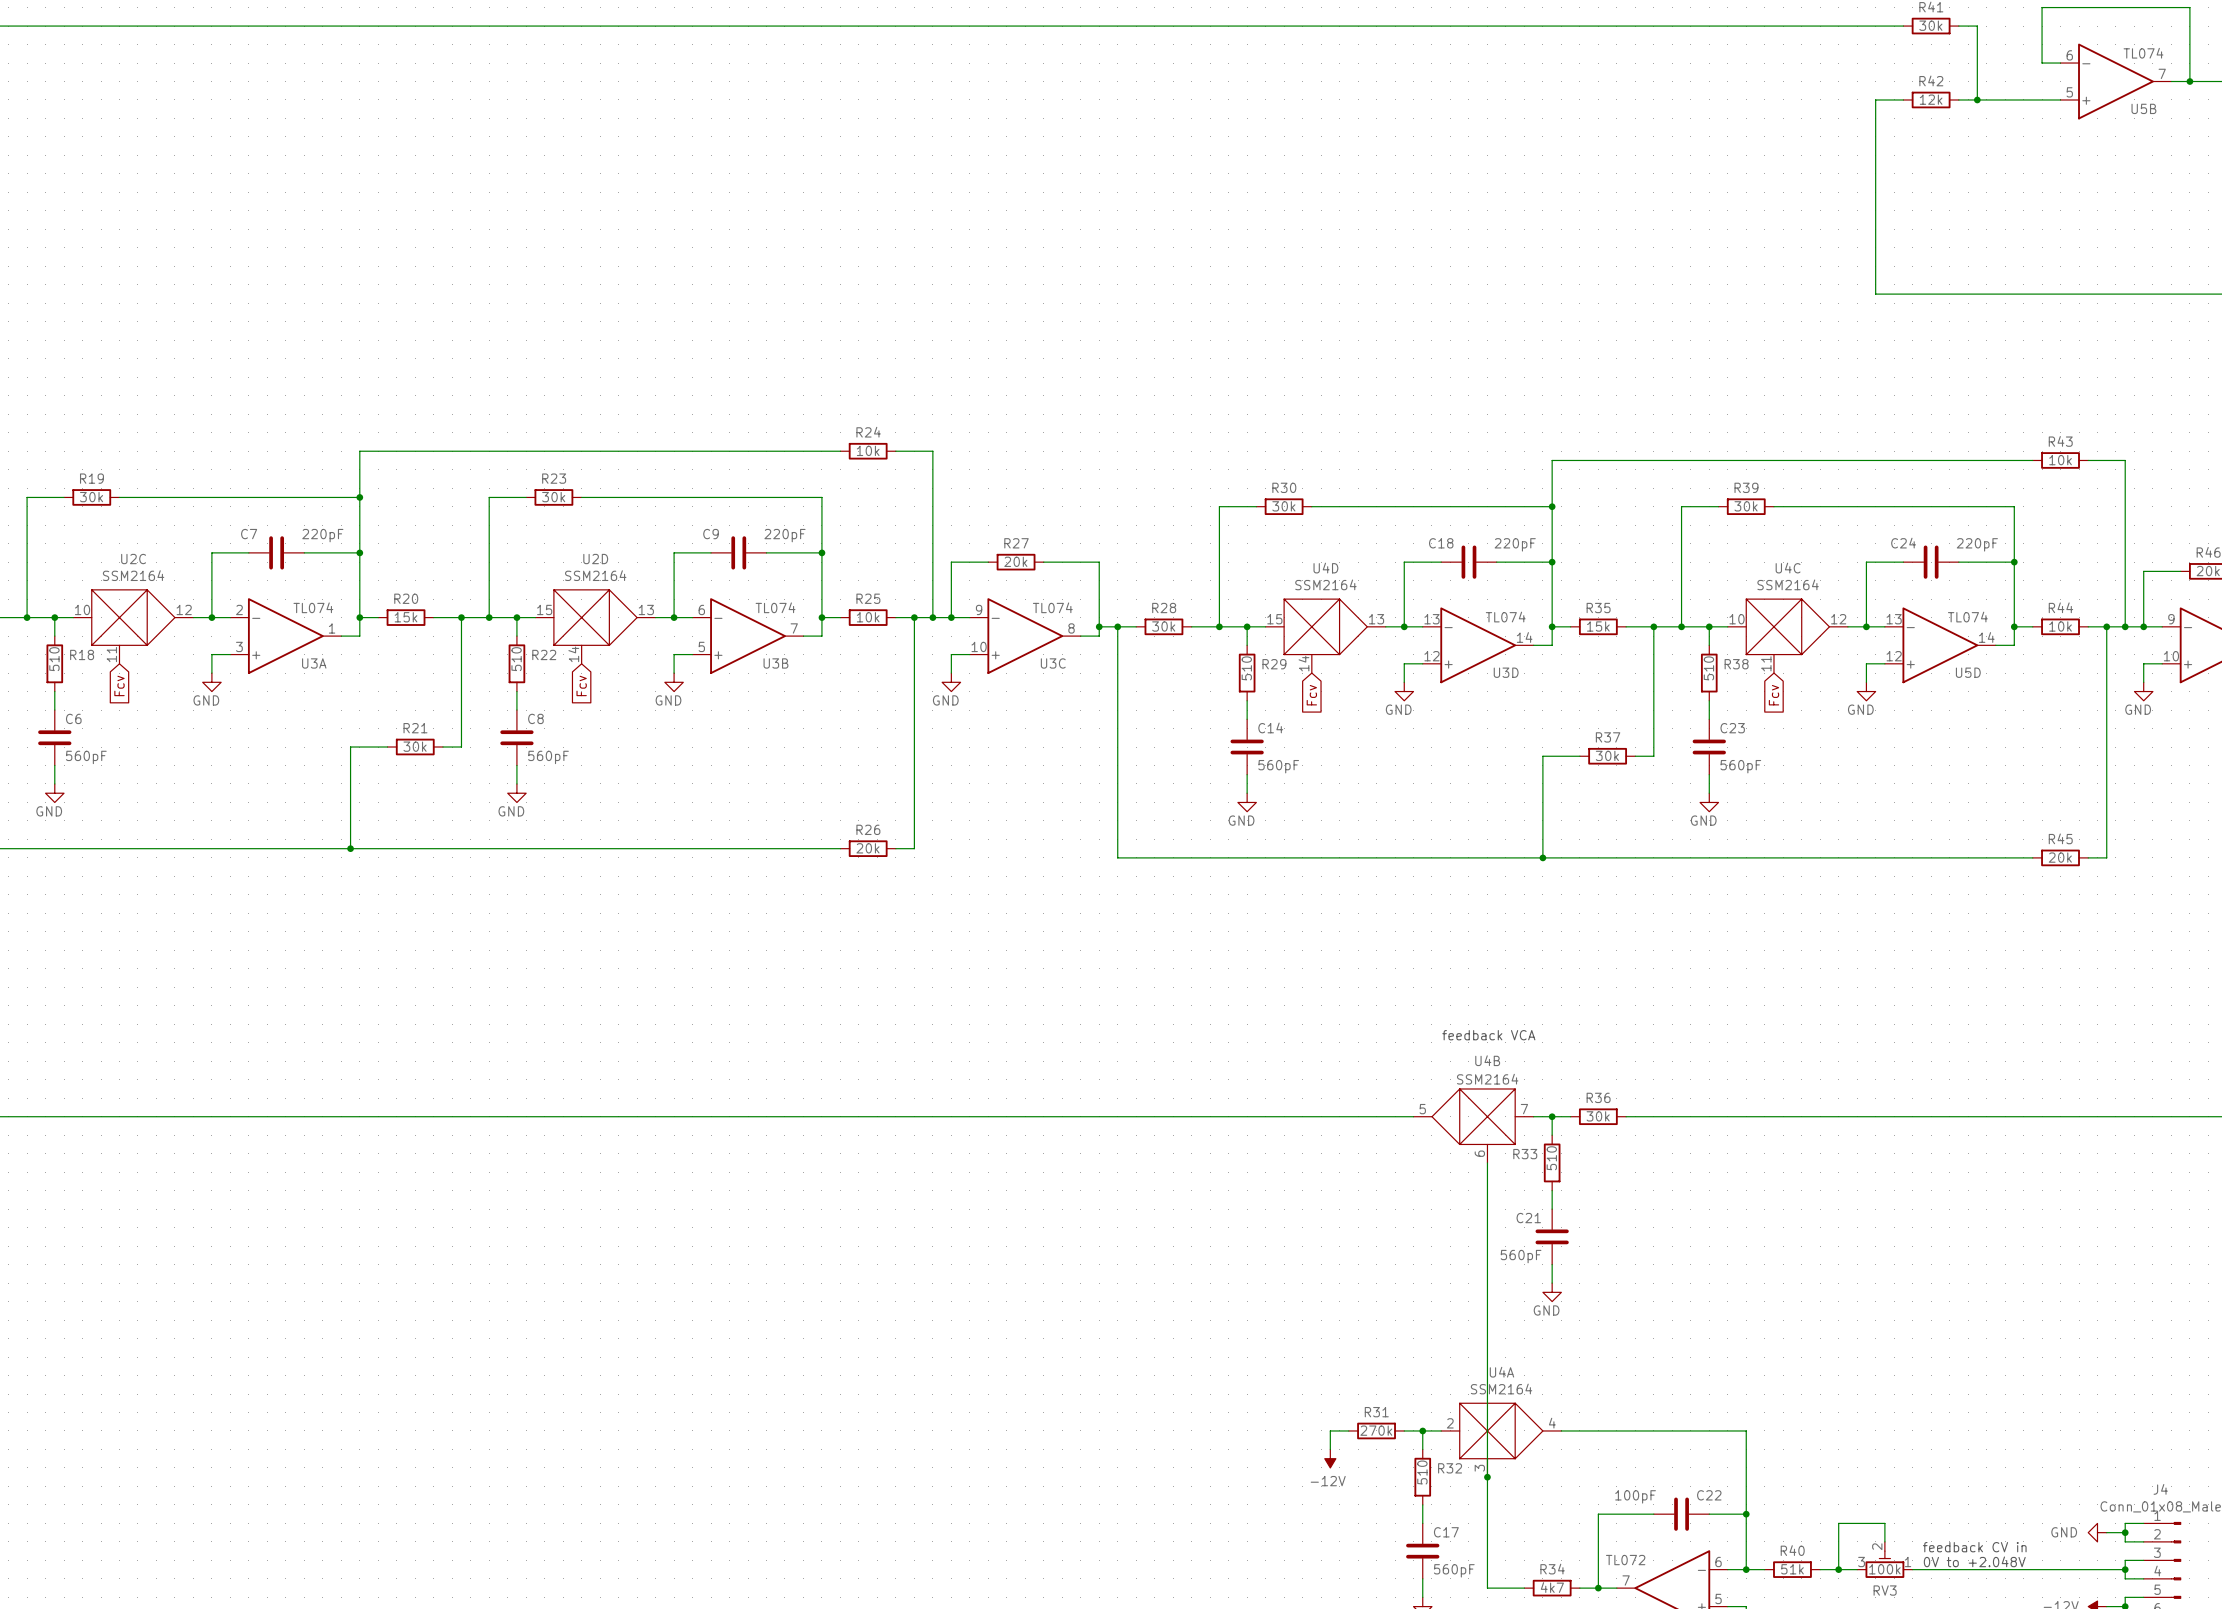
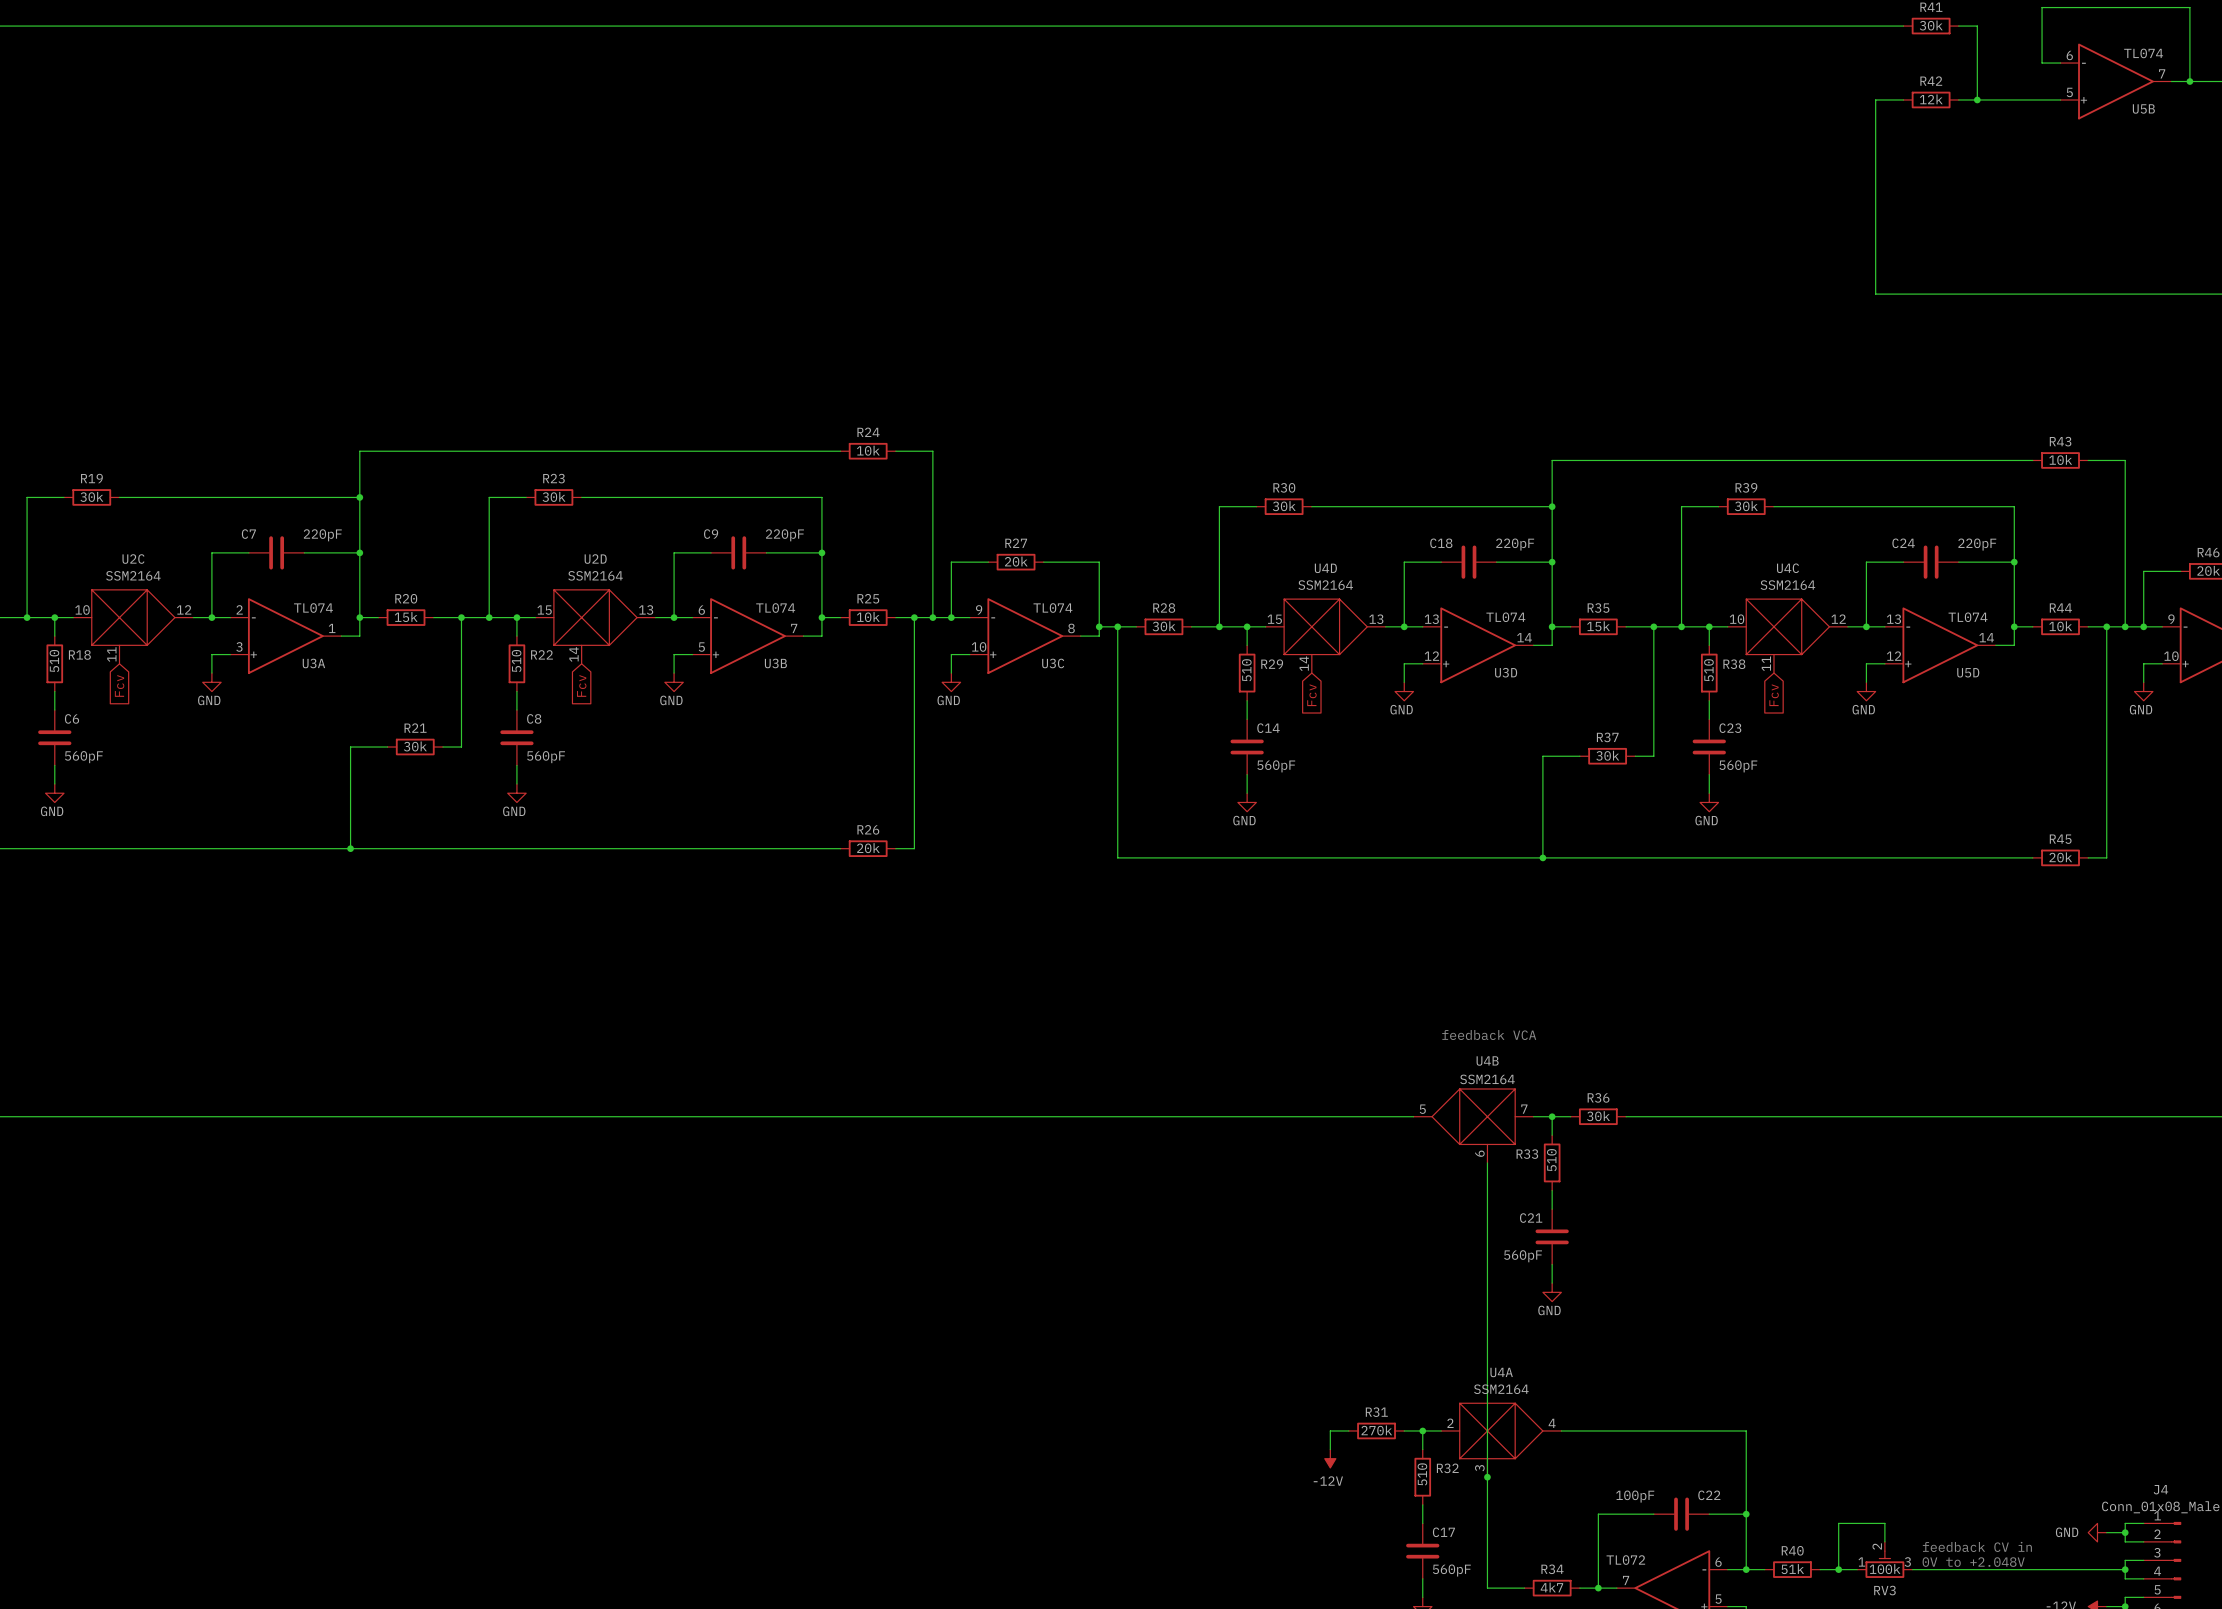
RV3 flip: as is (1884, 1564) -> left-right (1884, 1564)

